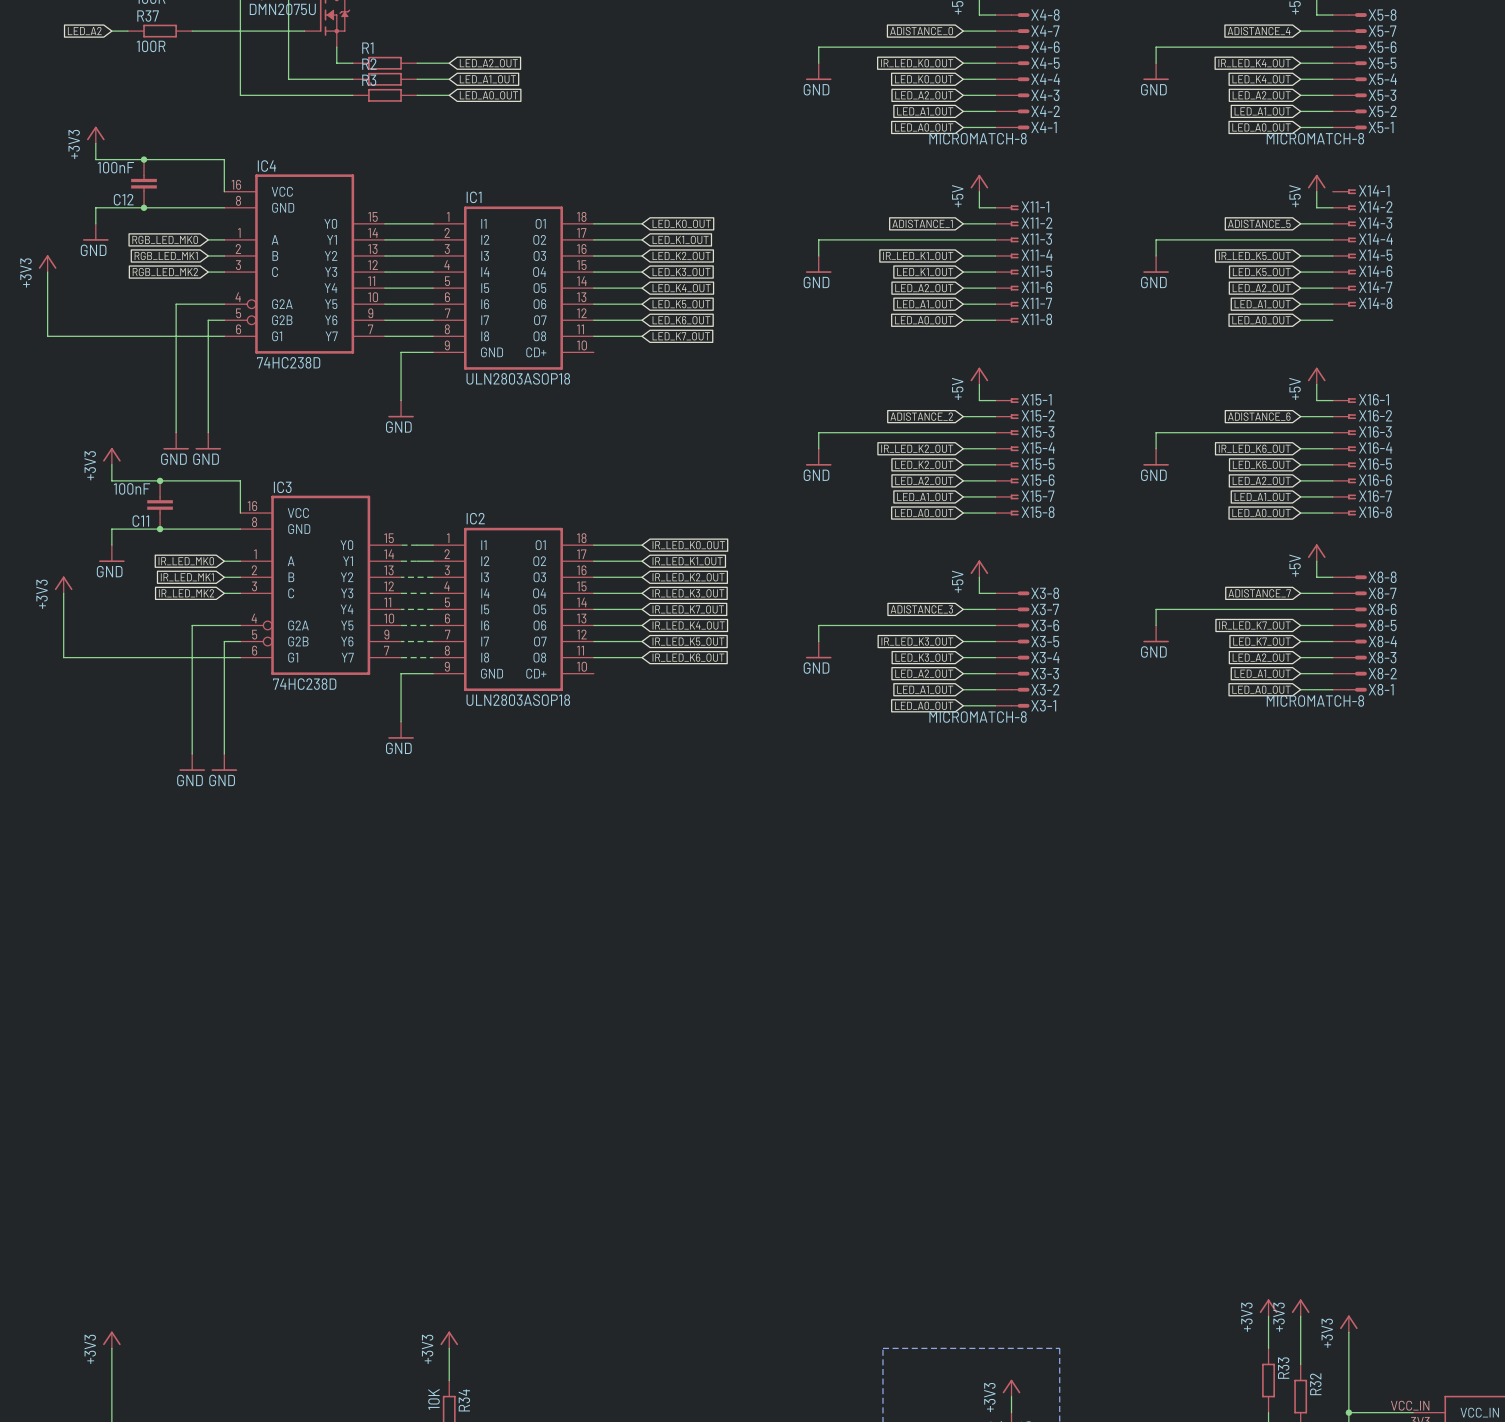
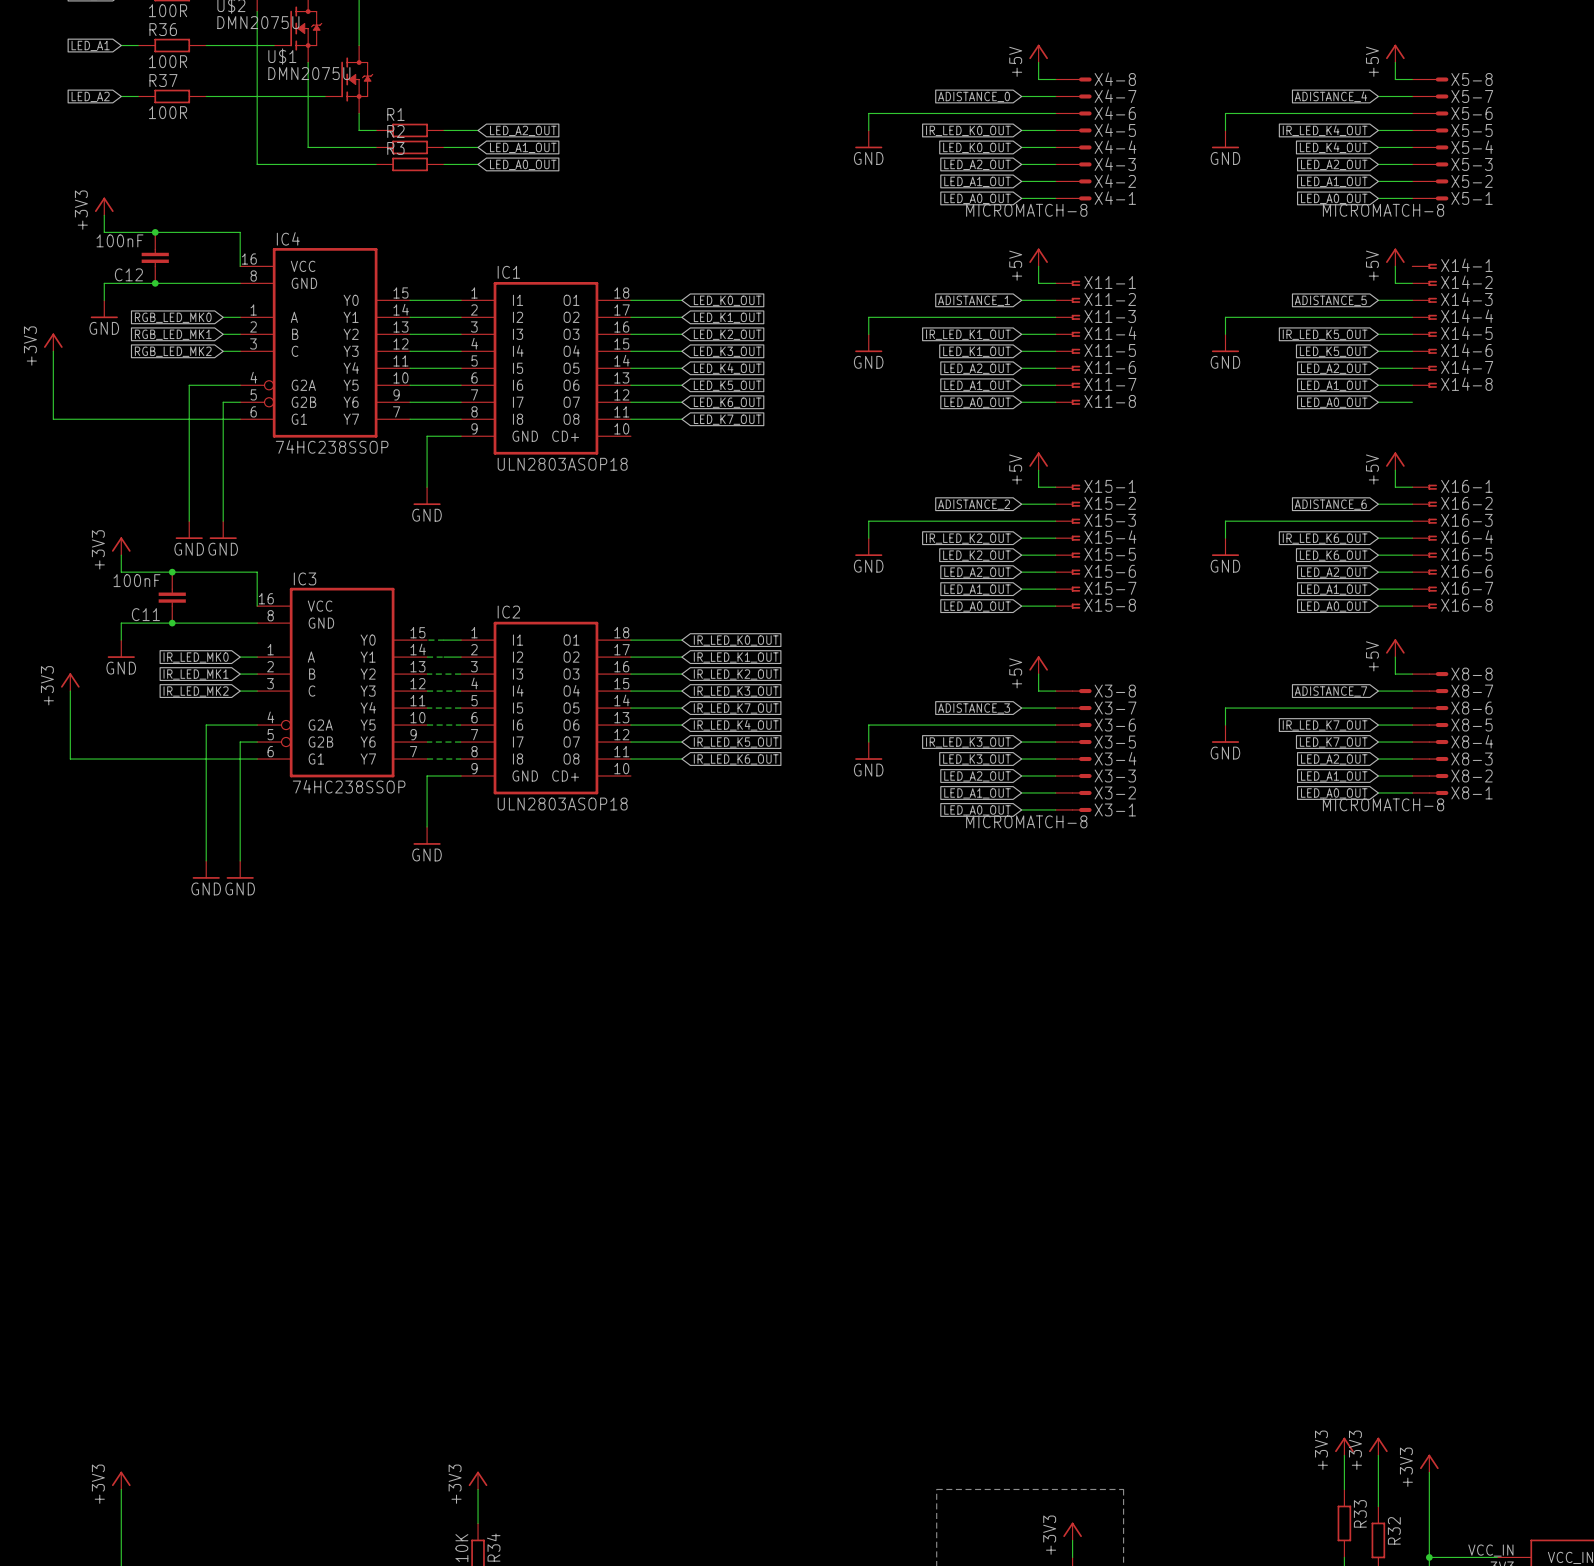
IC4 value: 74HC238D (288, 362) -> 74HC238SSOP (332, 447)
IC3 value: 74HC238D (304, 684) -> 74HC238SSOP (349, 786)

